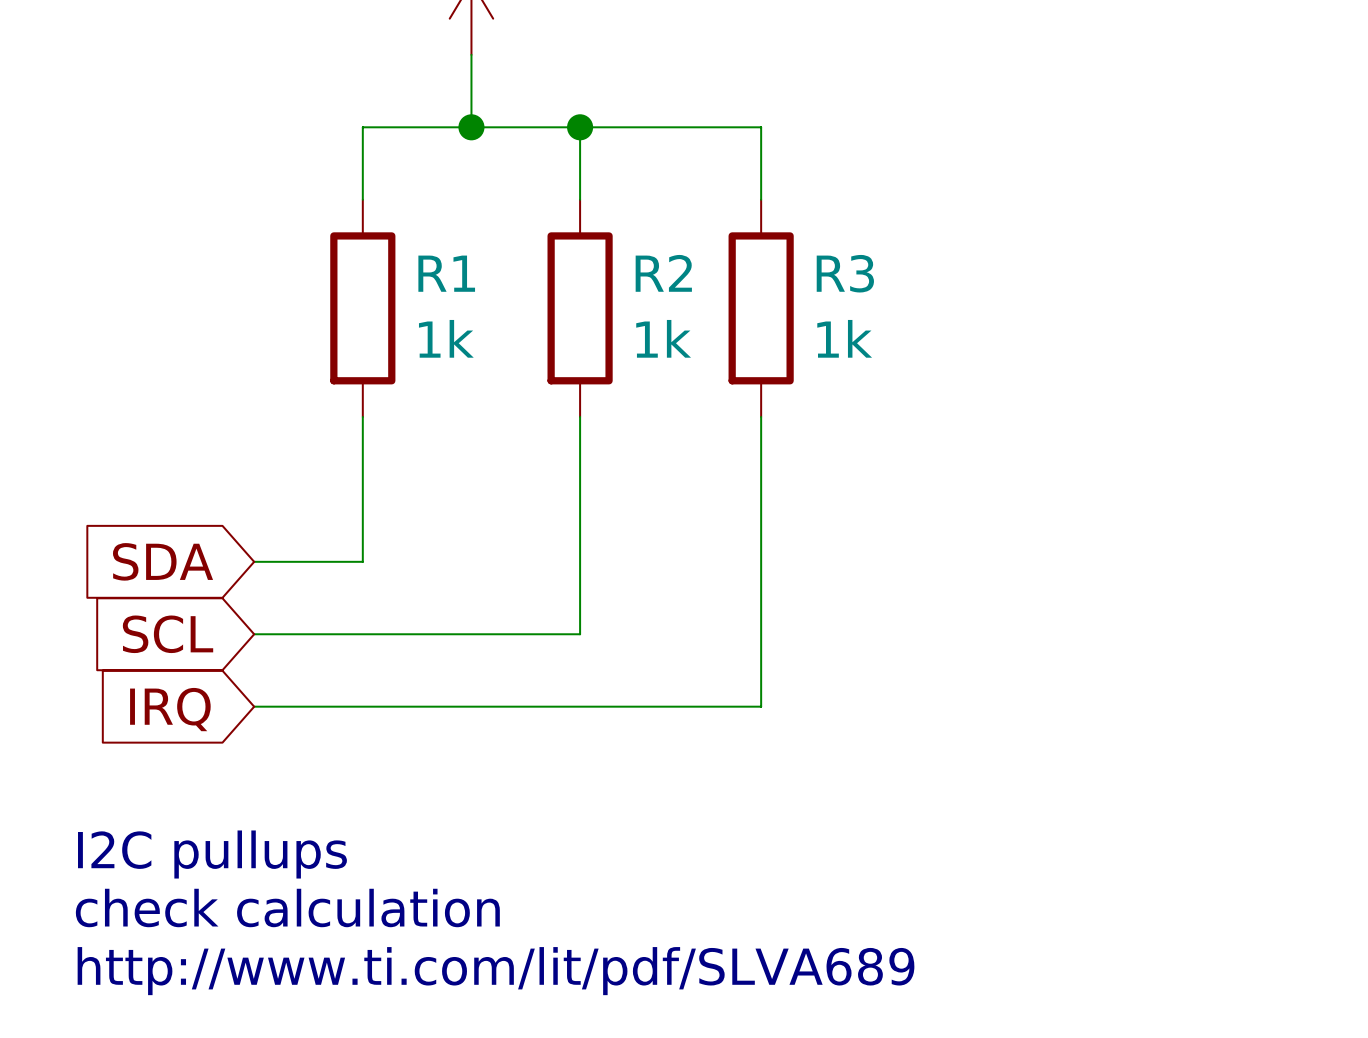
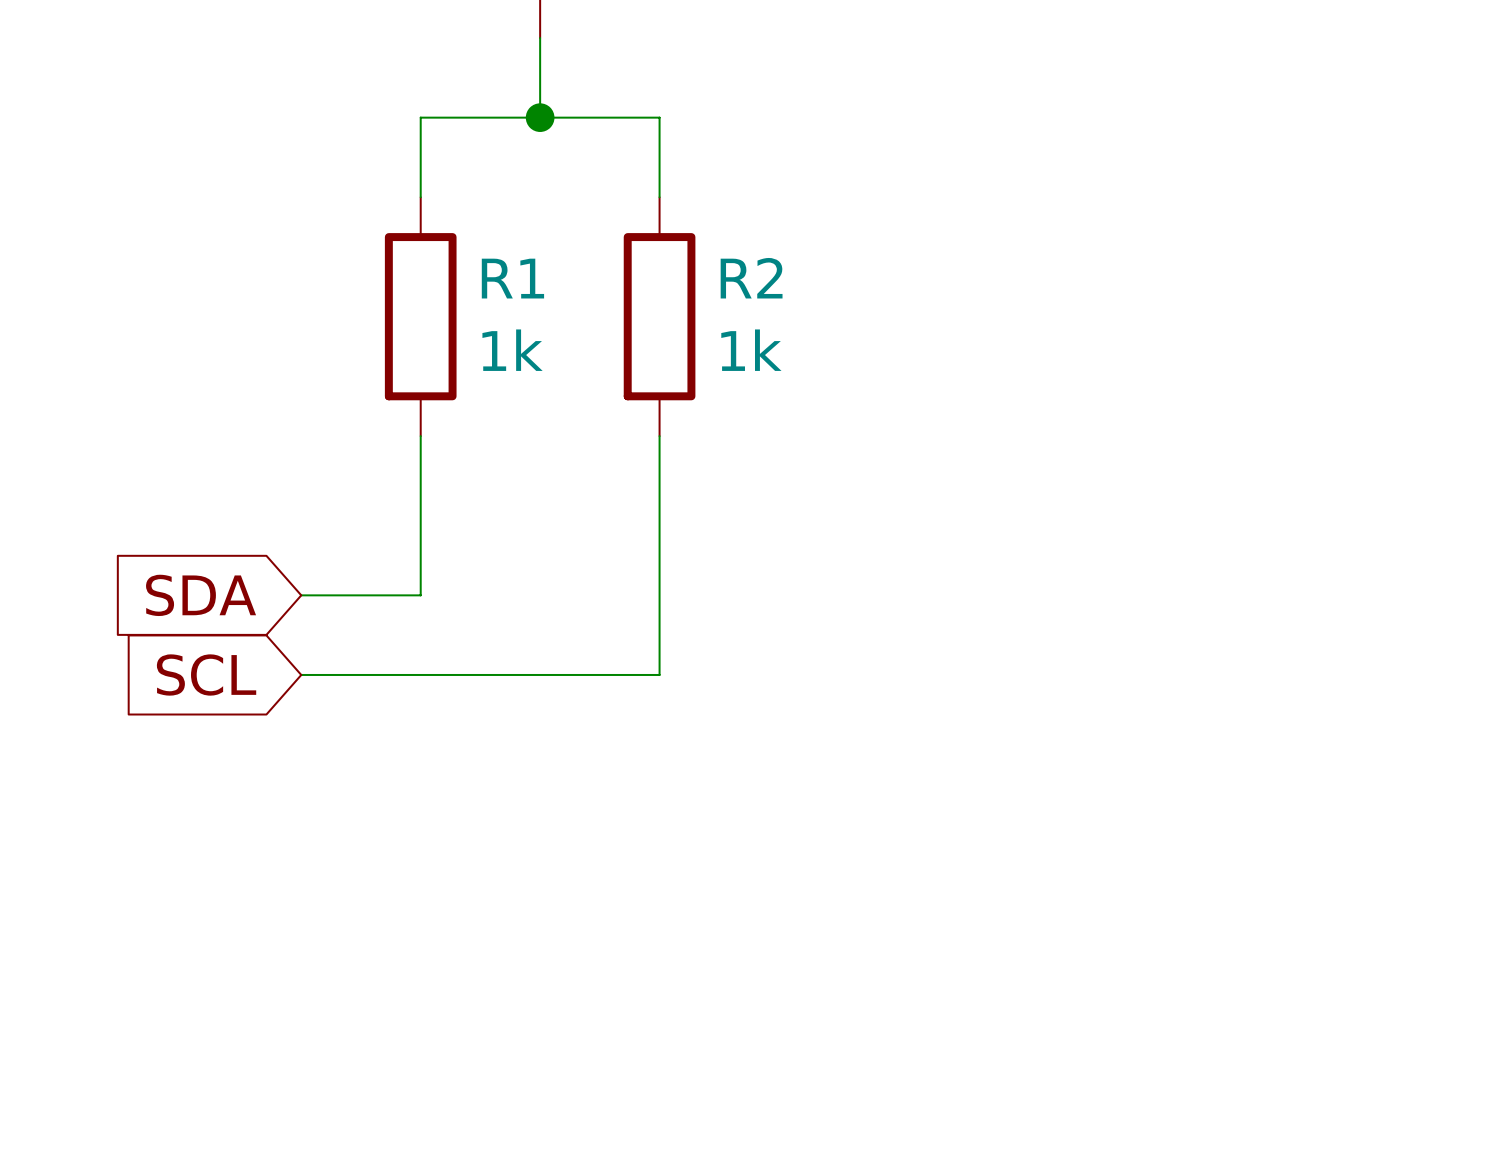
wire: (580, 127) (761, 127) (761, 199) -> none
junction: (580, 127) -> none
R3: 1k (761, 308) -> none
wire: (761, 416) (761, 706) (254, 706) -> none
global label: IRQ (170, 709) -> none
text: I2C pullups (212, 854) -> none
text: check calculation (287, 907) -> none
text: http://www.ti.com/lit/pdf/SLVA689 (496, 971) -> none

